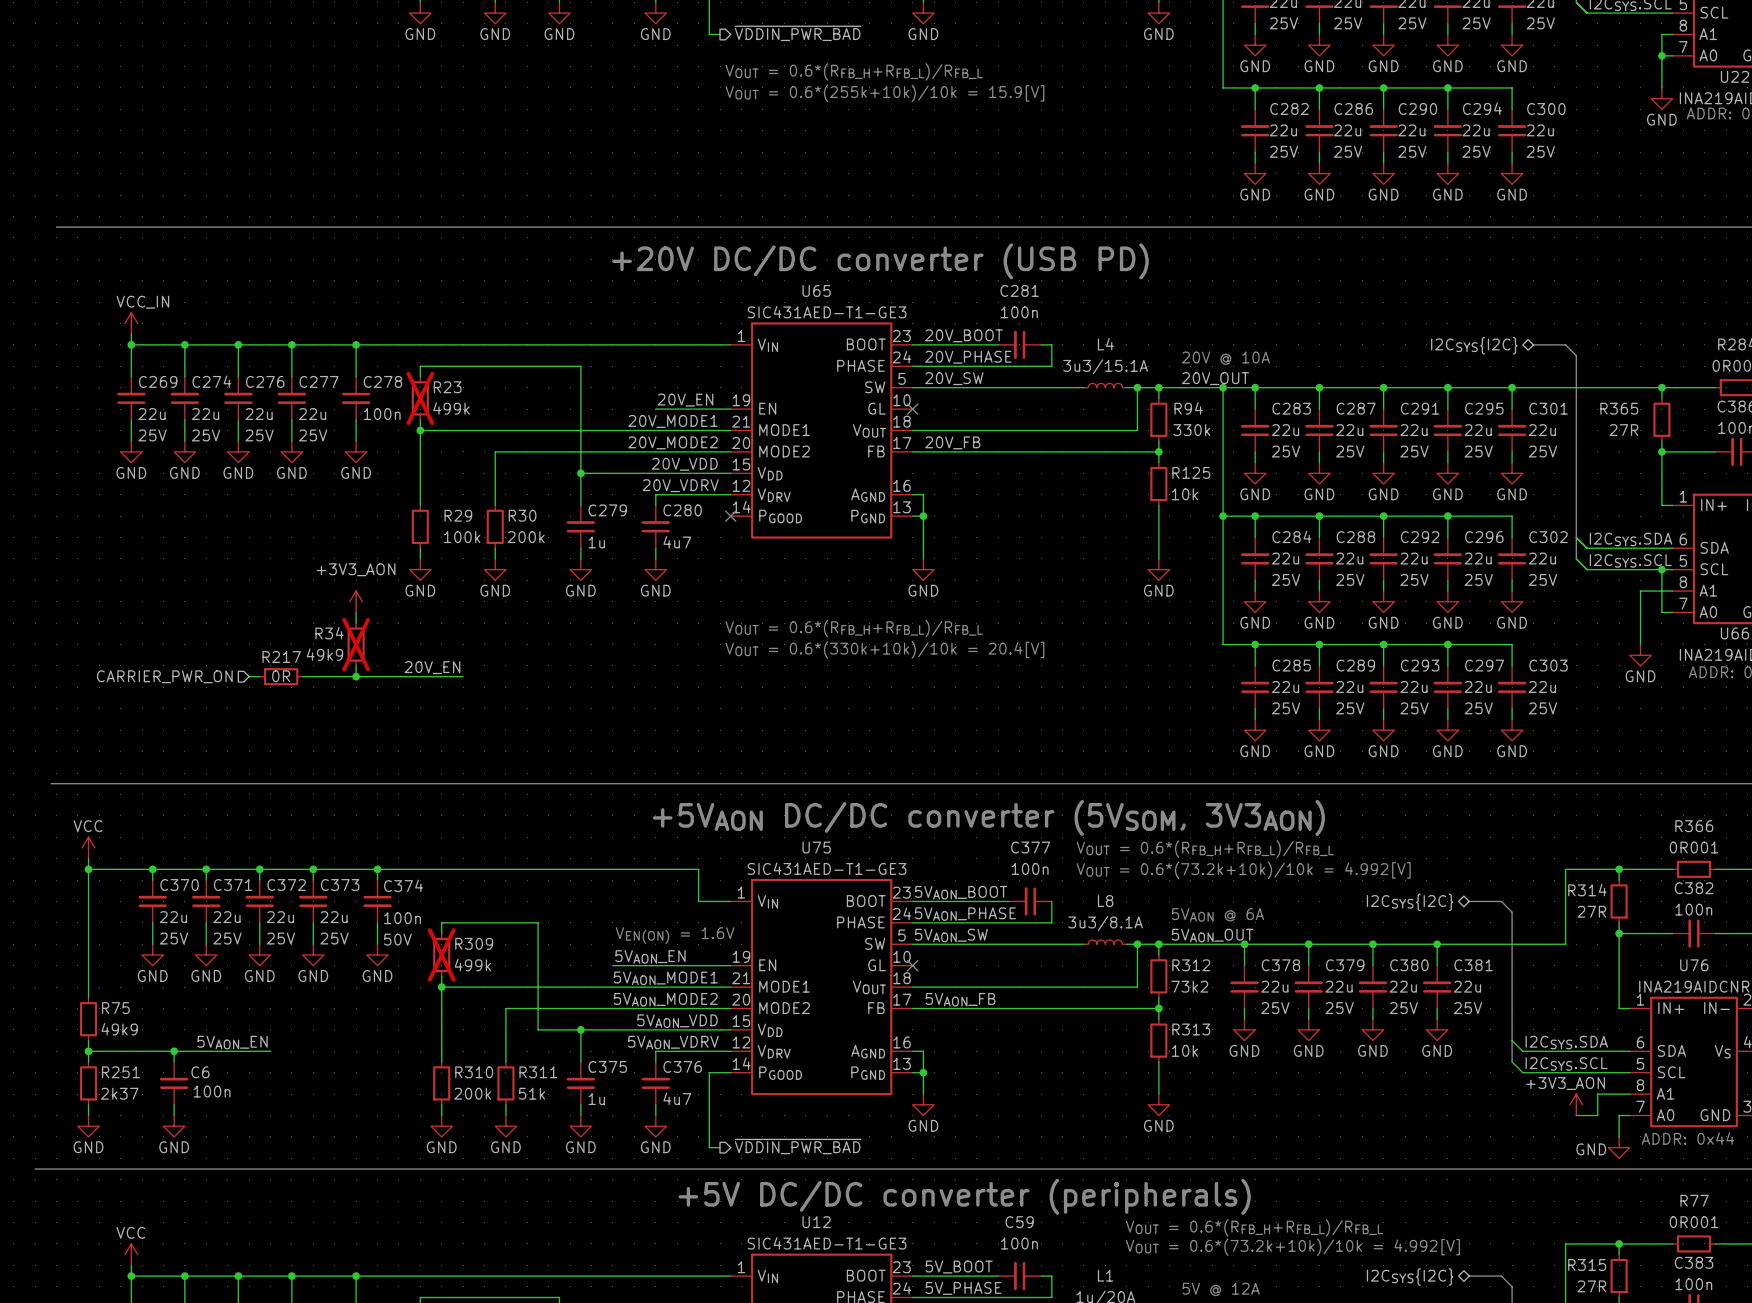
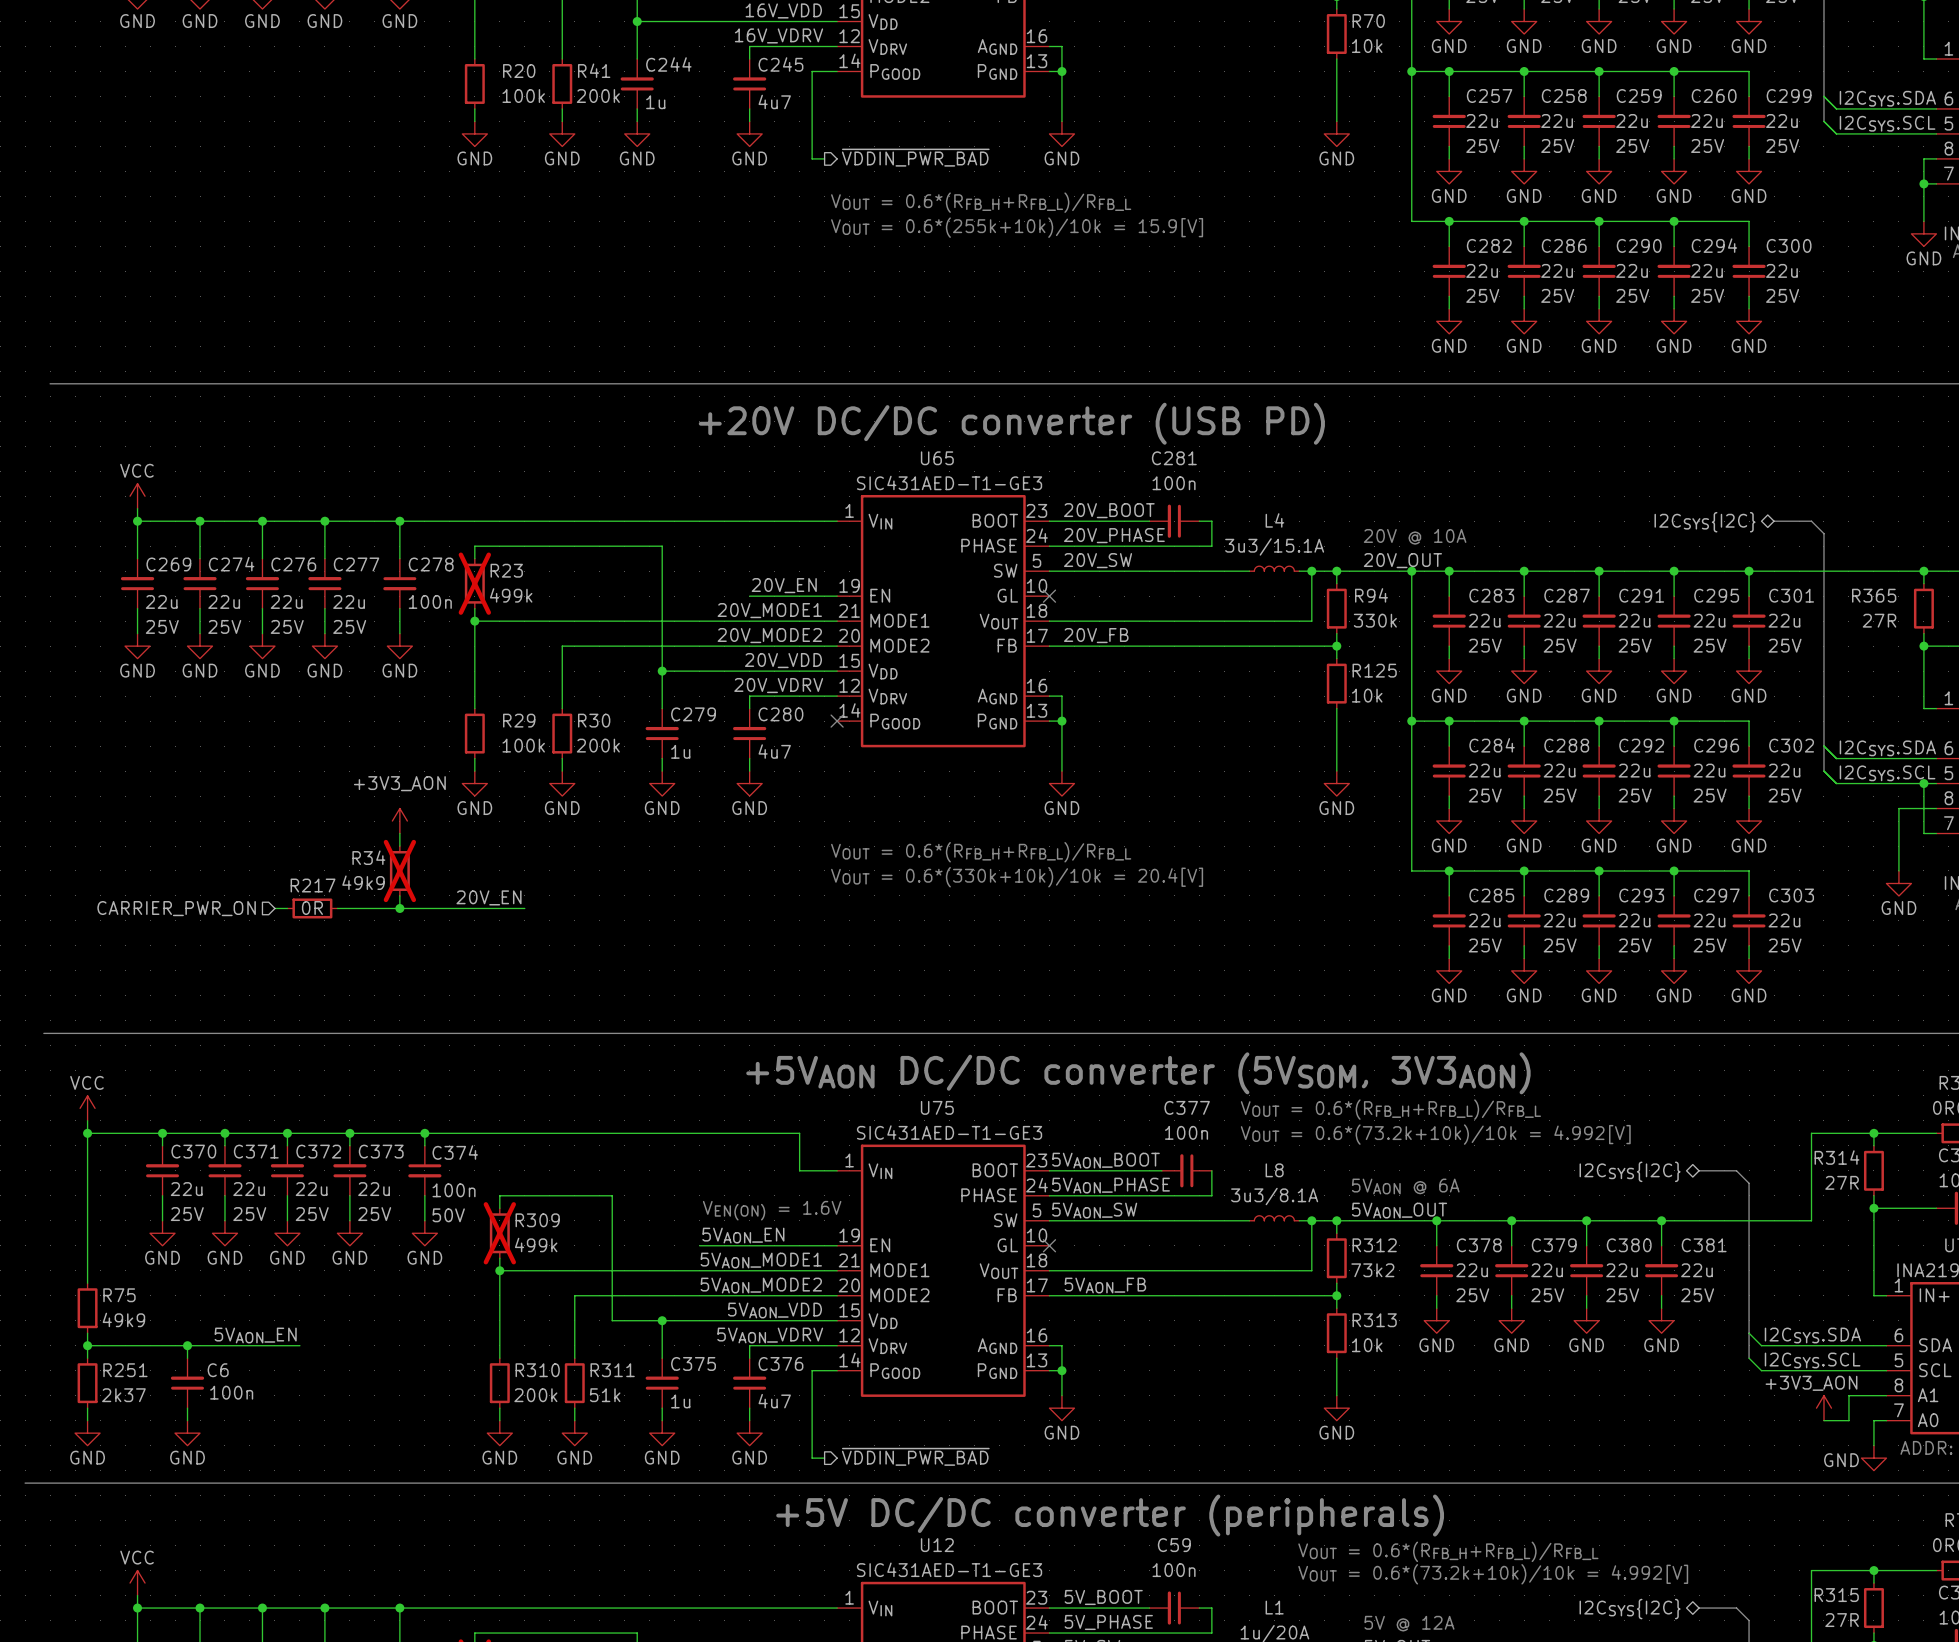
power symbol: VCC_IN (131, 323) -> VCC (137, 496)

